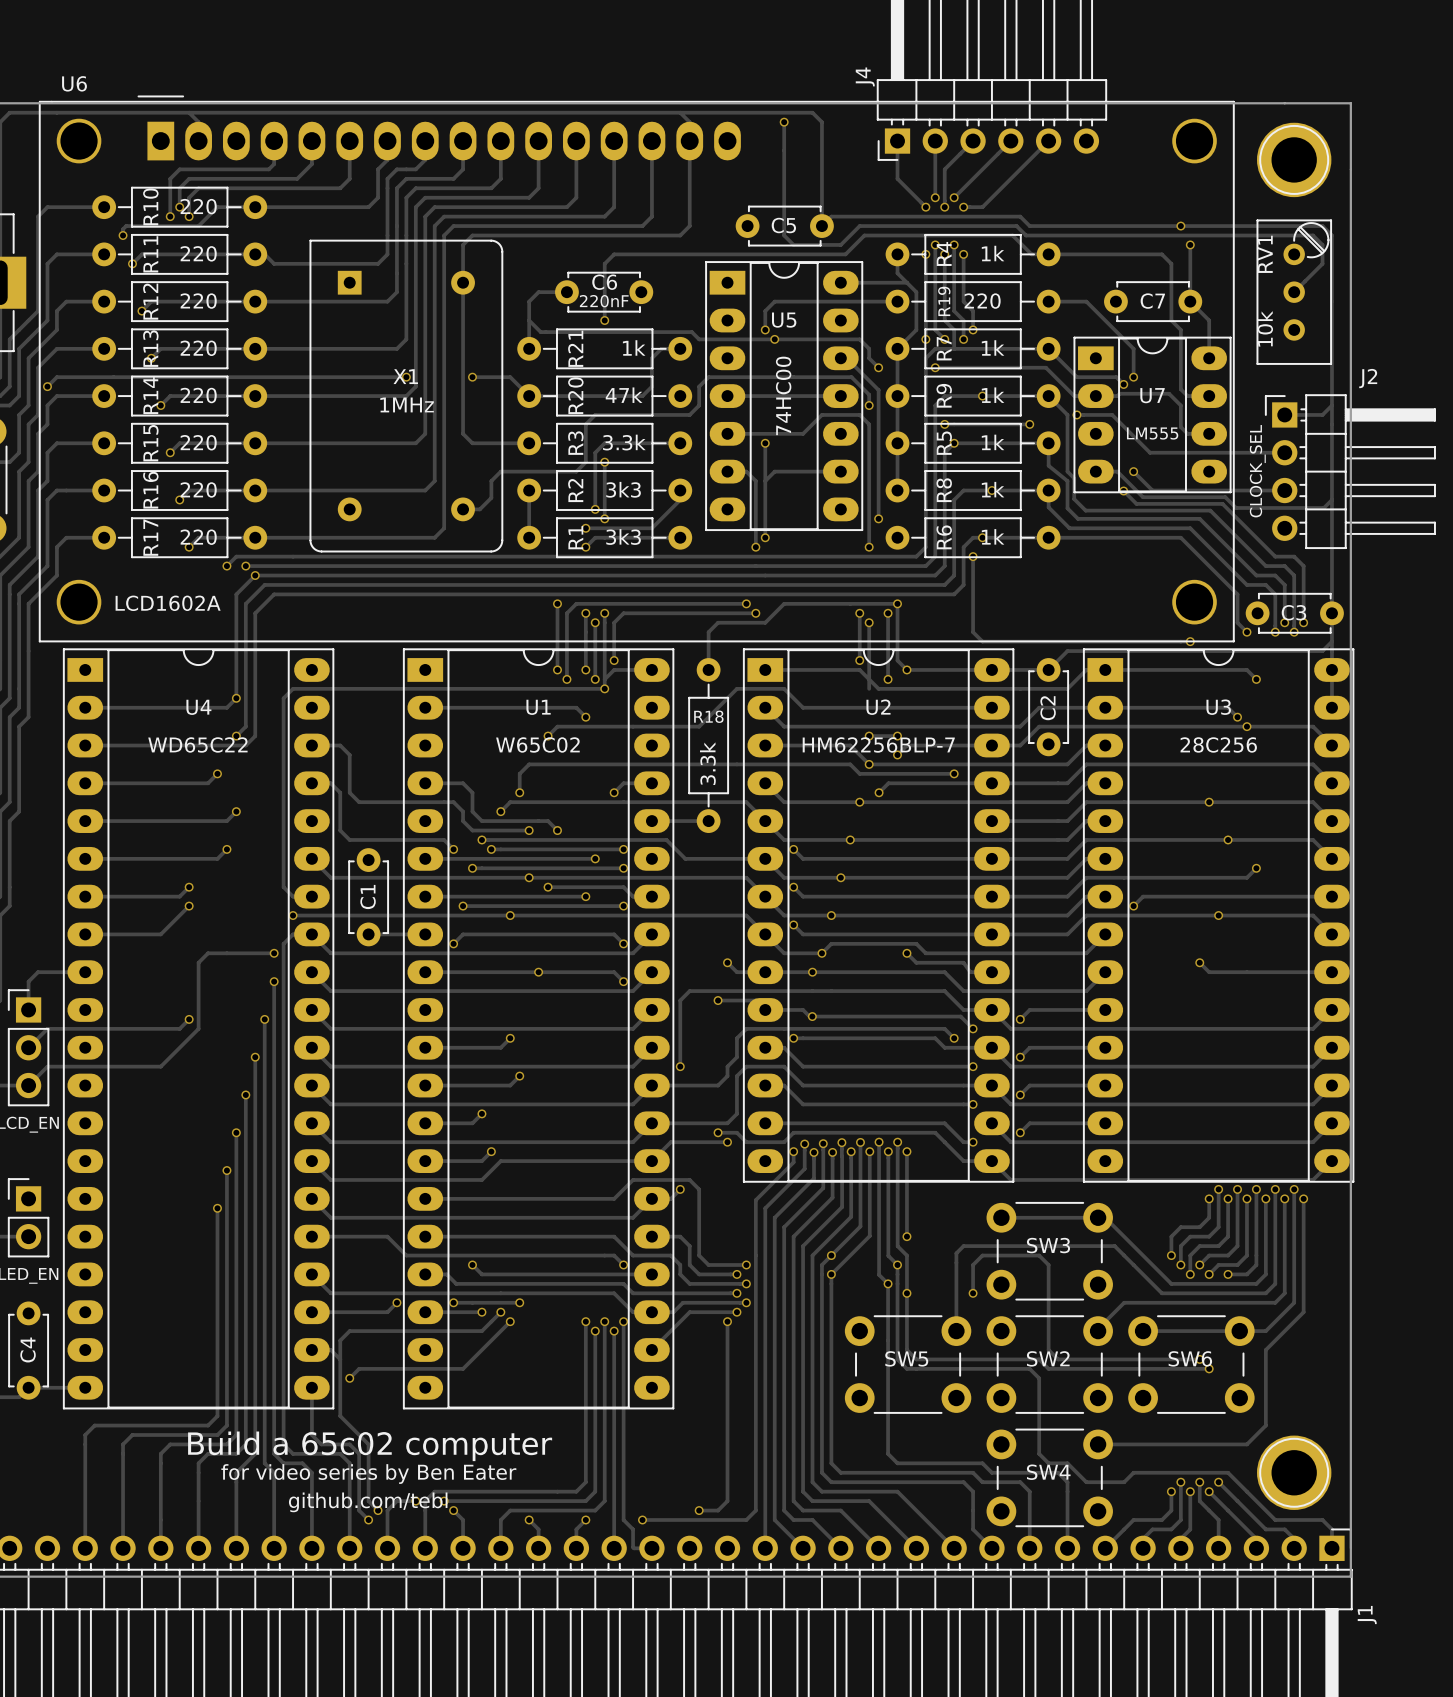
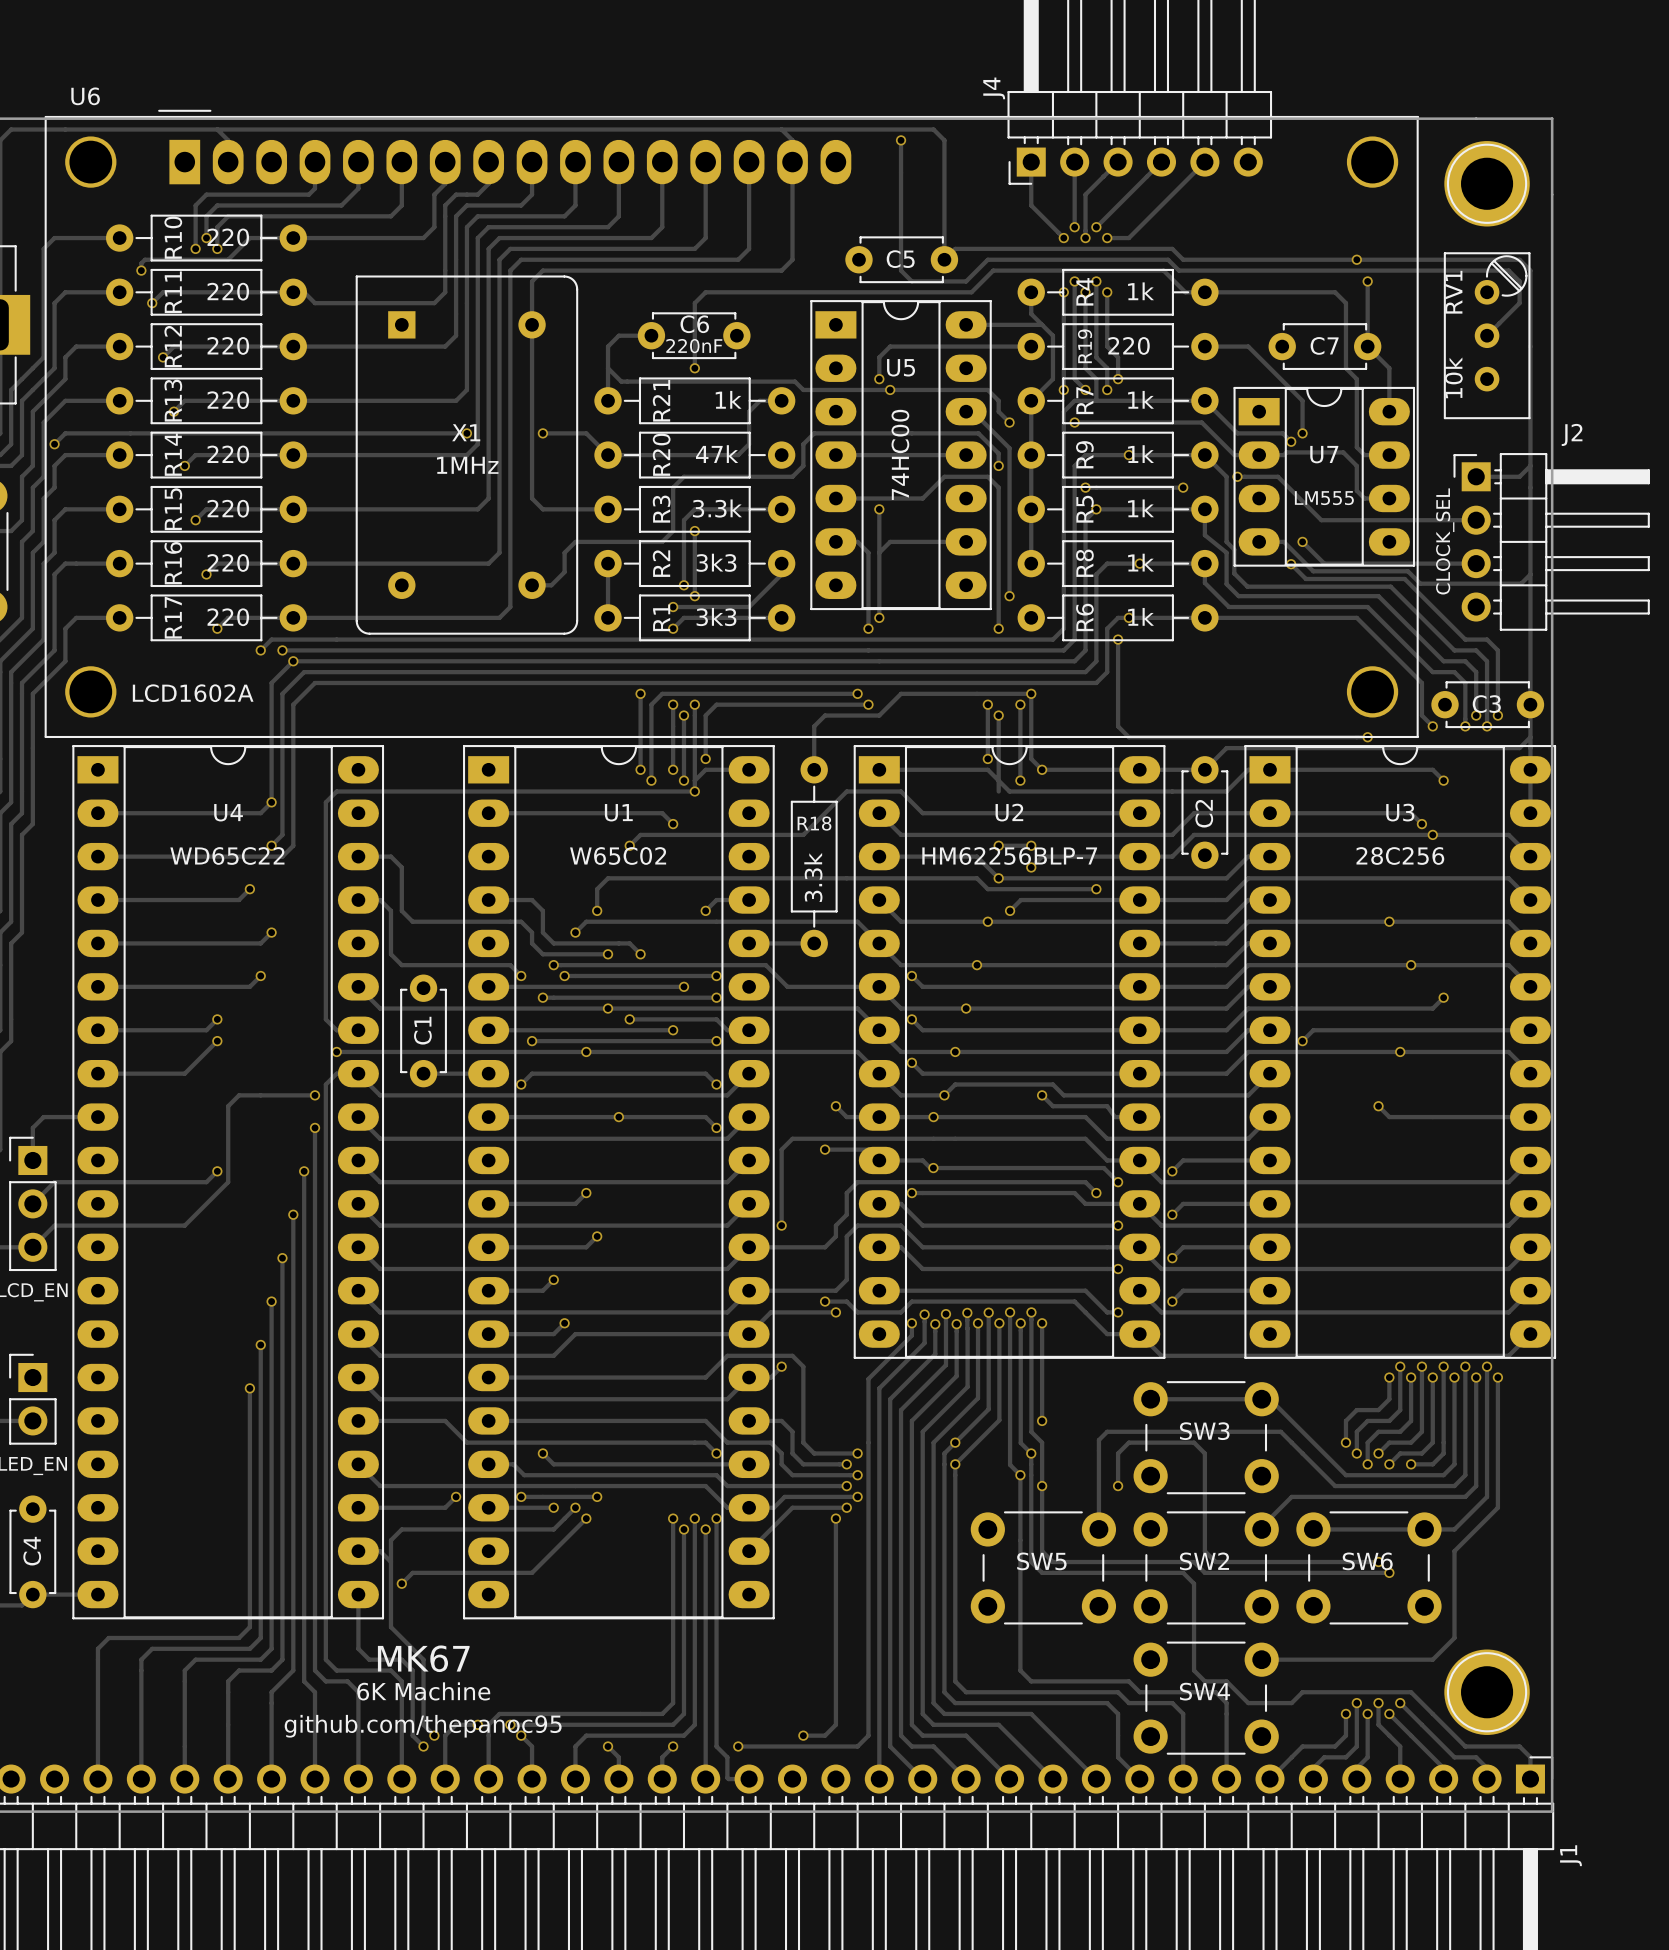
text: Build a 65c02 computer (370, 1446) -> MK67 (423, 1658)
text: for video series by Ben Eater (368, 1474) -> 6K Machine (423, 1691)
text: github.com/tebl (368, 1502) -> github.com/thepanoc95 (423, 1726)

